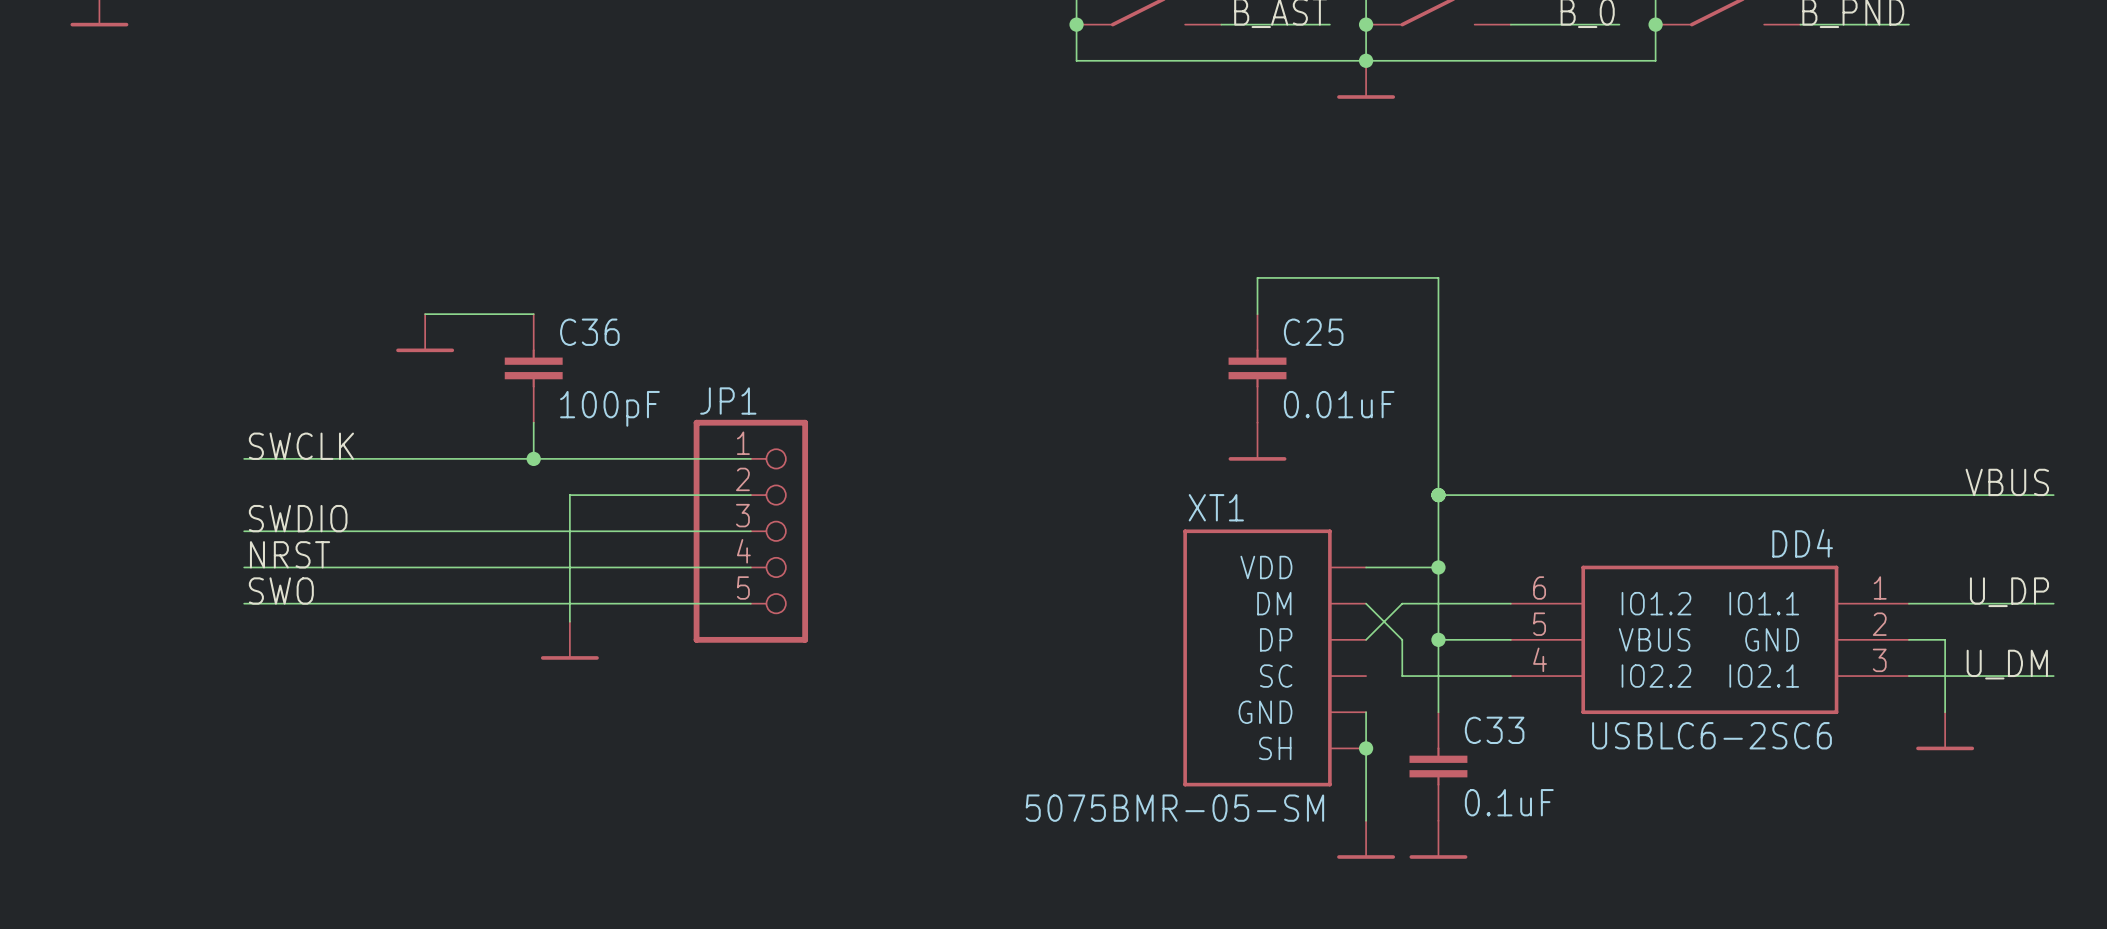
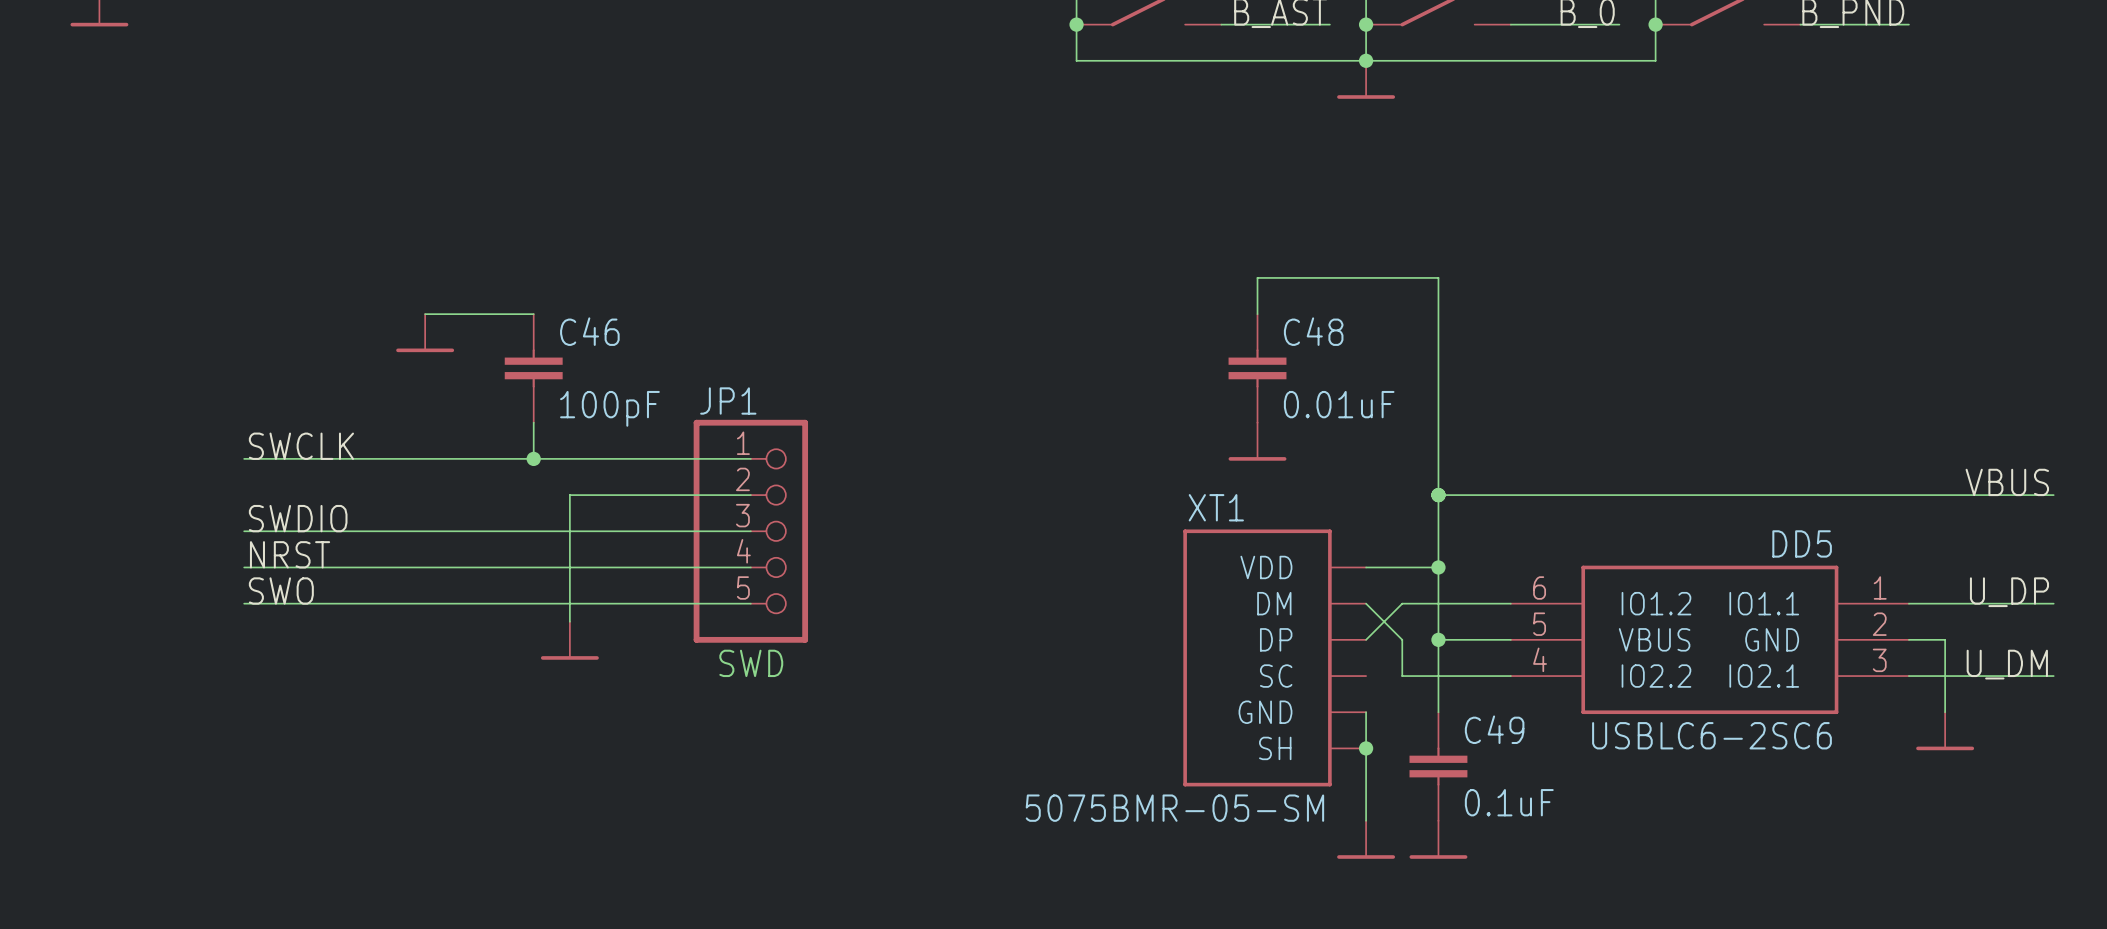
C36 name: C36 (589, 332) -> C46 (589, 331)
C25 name: C25 (1313, 332) -> C48 (1313, 331)
DD4 name: DD4 (1802, 543) -> DD5 (1802, 543)
text: none -> SWD (751, 663)
C33 name: C33 (1494, 730) -> C49 (1494, 729)

